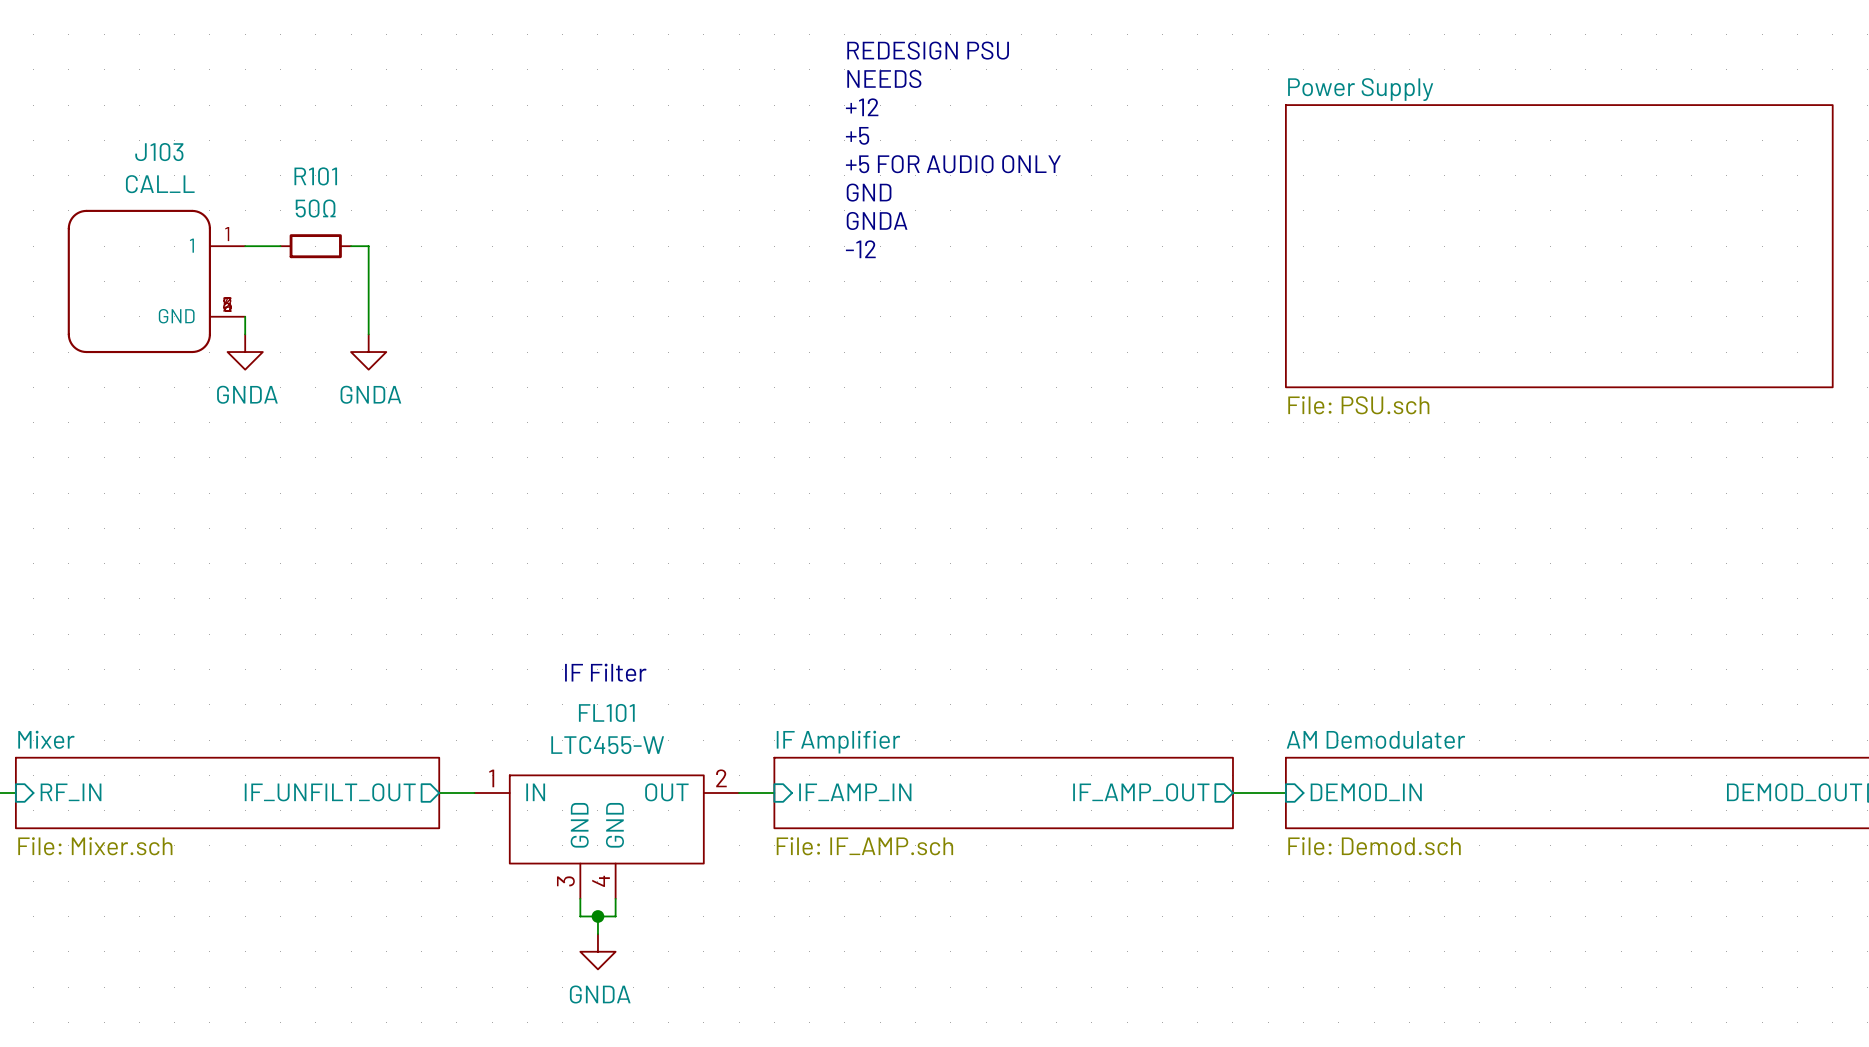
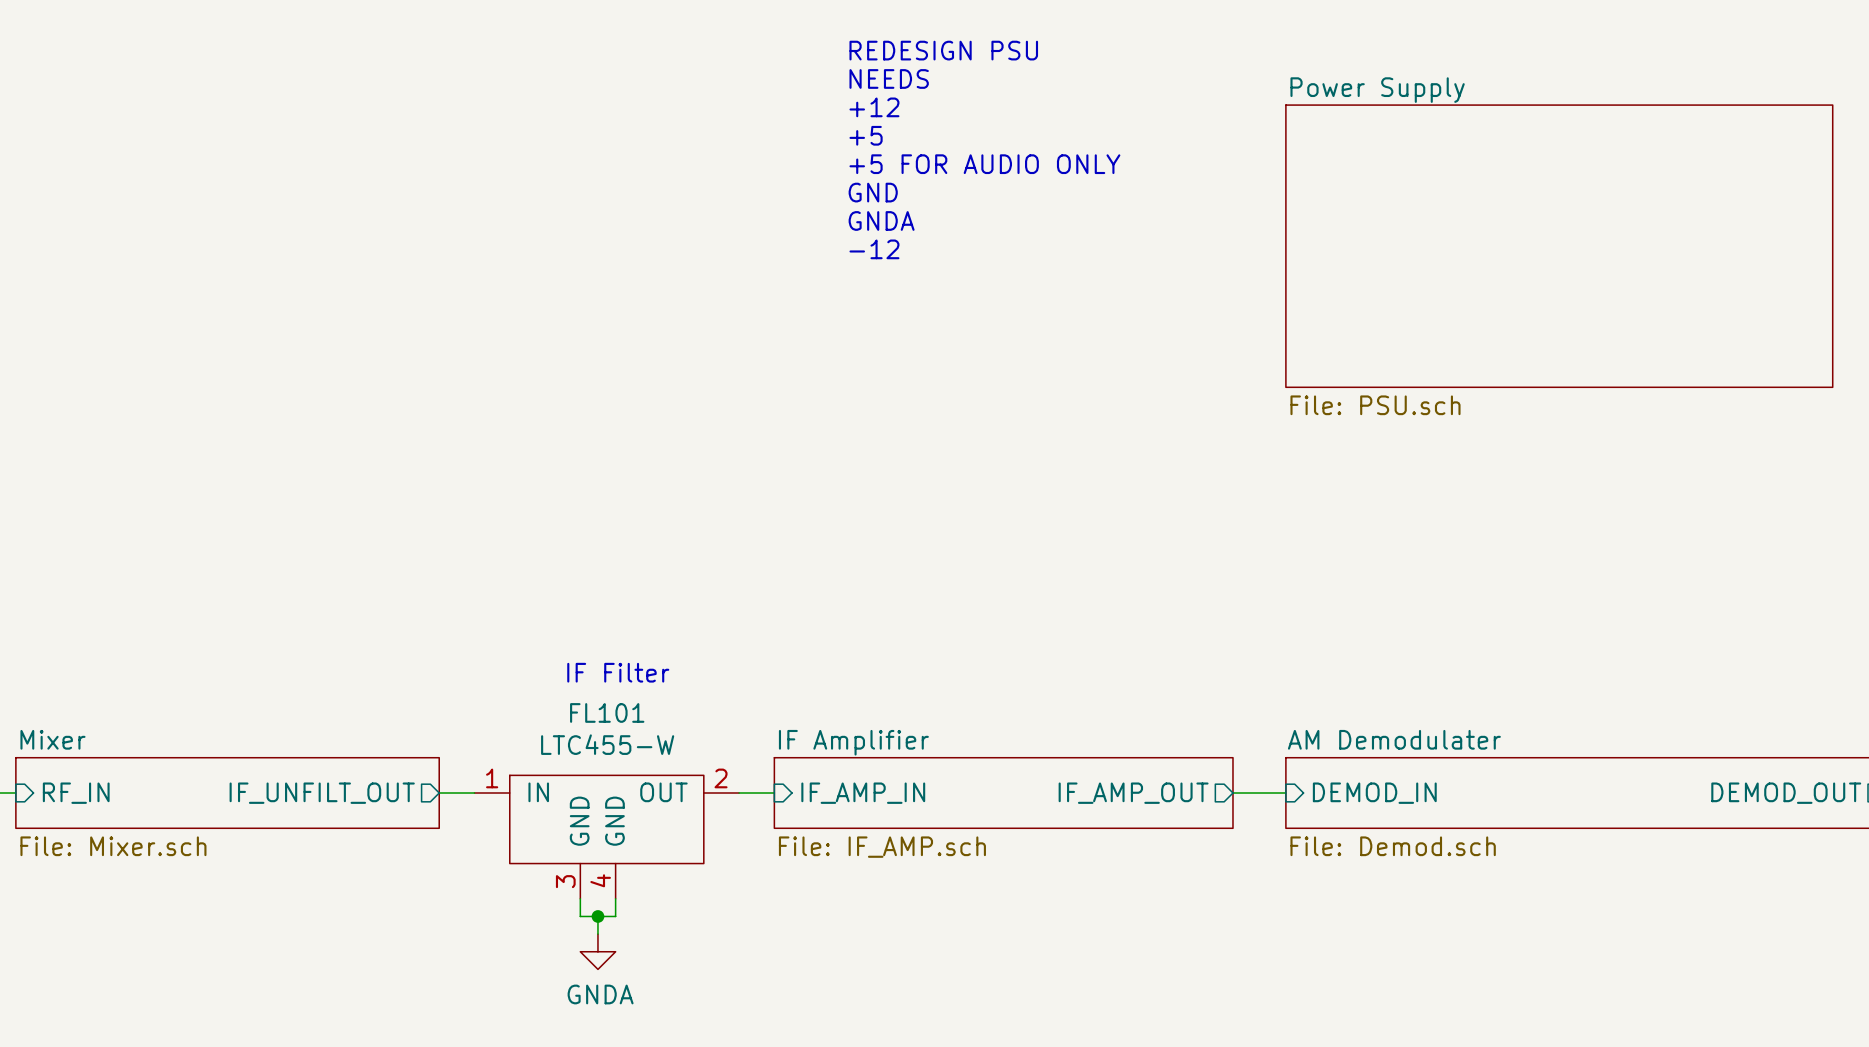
wire: (245, 246) (280, 246) -> none
R101: 50Ω (315, 246) -> none
wire: (351, 246) (368, 246) (368, 334) -> none
J103: CAL_L (156, 281) -> none
wire: (245, 316) (245, 334) -> none
power symbol: GNDA (245, 352) -> none
power symbol: GNDA (368, 352) -> none

